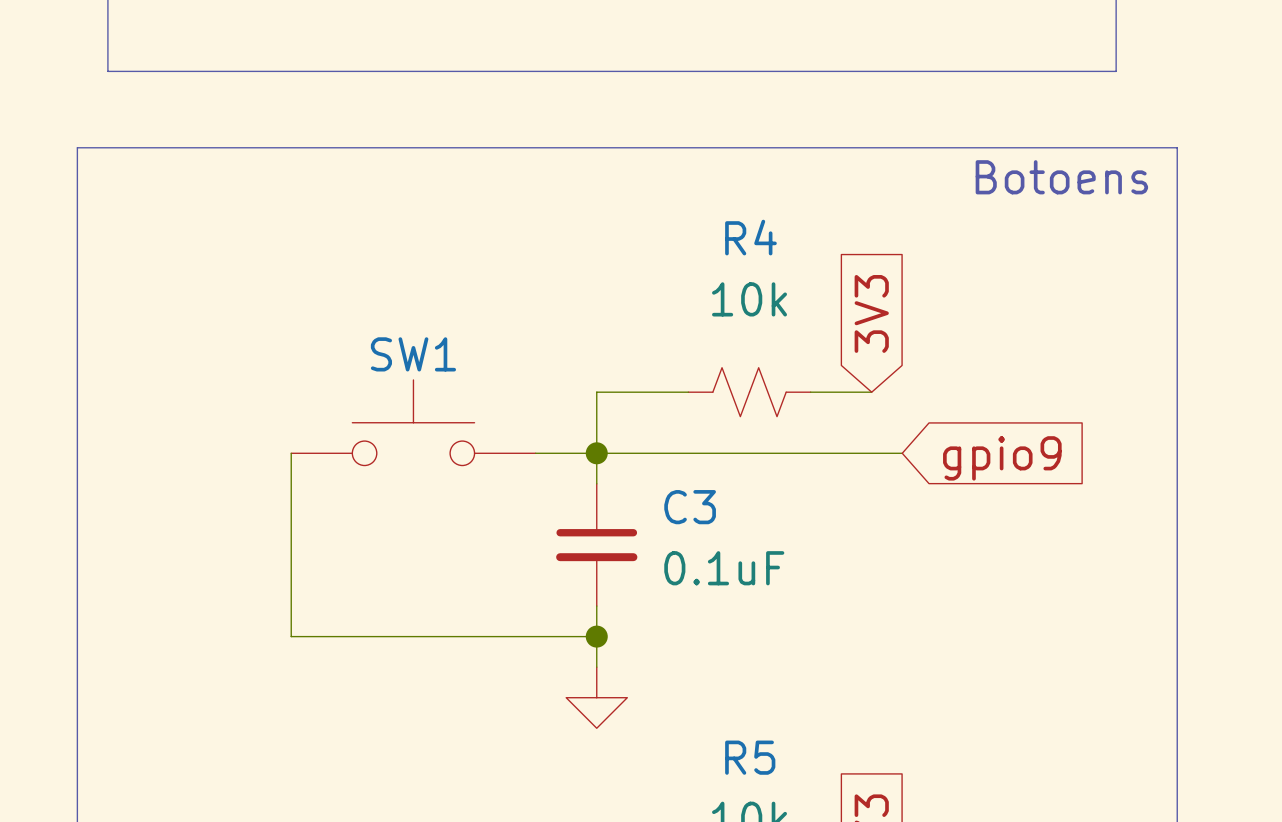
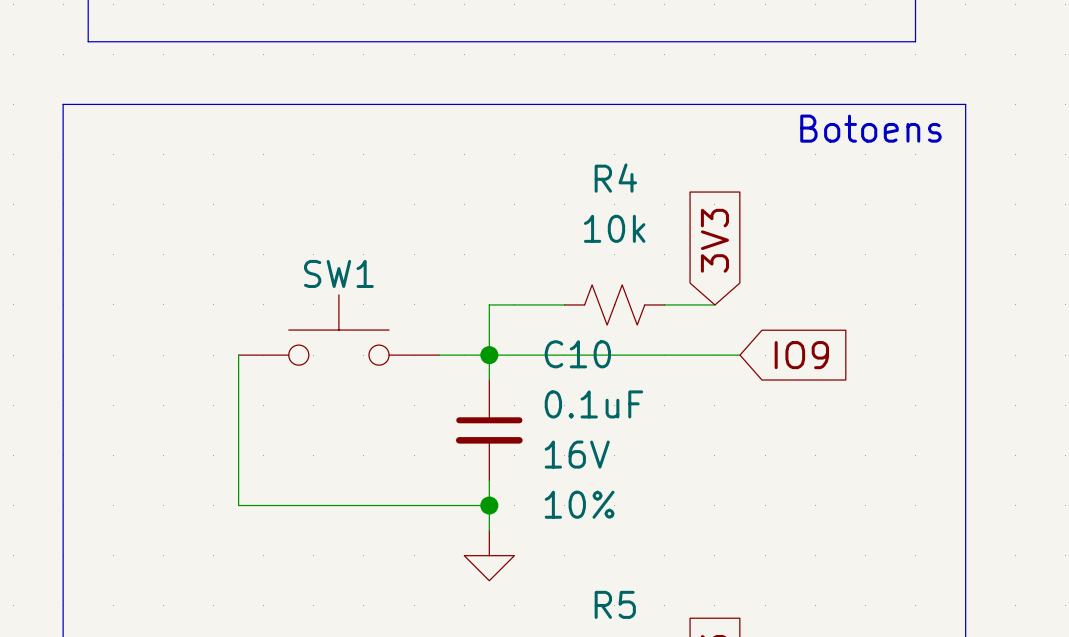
global label: gpio9 (1002, 458) -> IO9 (801, 355)
C3 name: C3 (690, 507) -> C10 (577, 354)
C3 value position: 0.1uF (724, 568) -> 0.1uF (593, 404)
C3 text: none -> 16V (577, 454)
C3 text: none -> 10% (579, 504)

